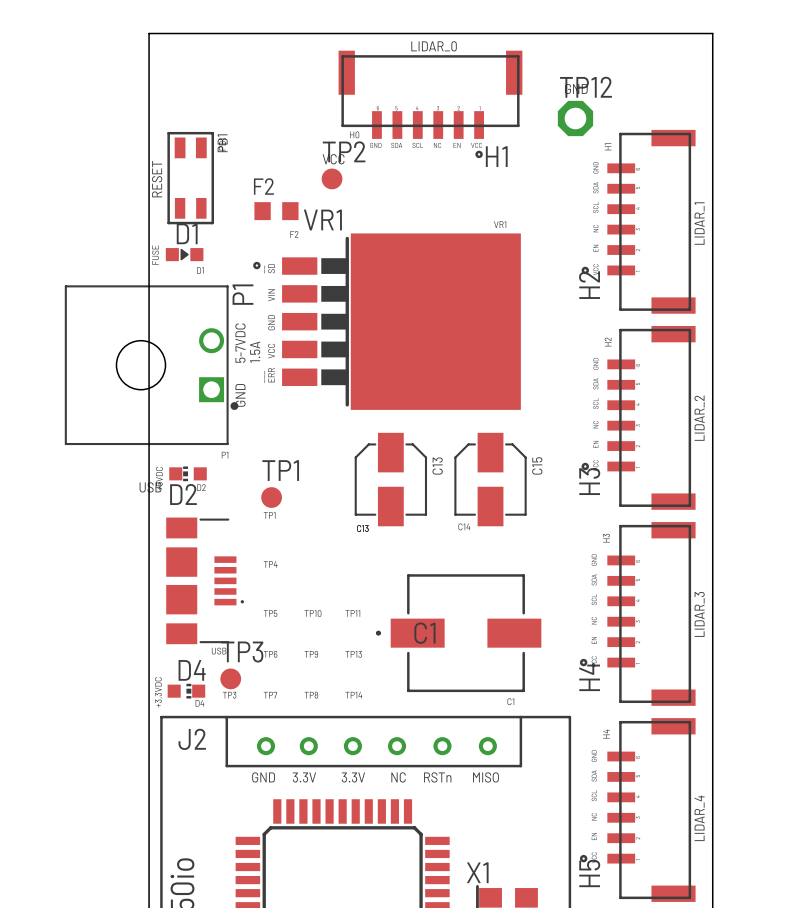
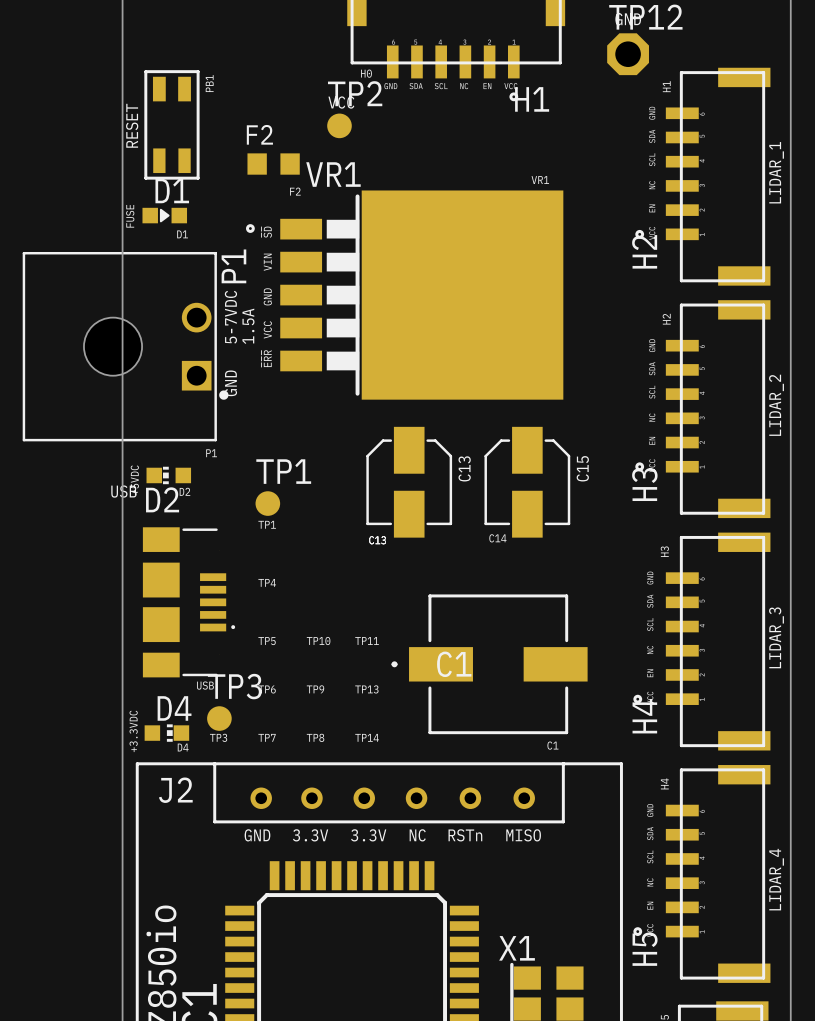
PB1 name: PB1 (222, 143) -> none

